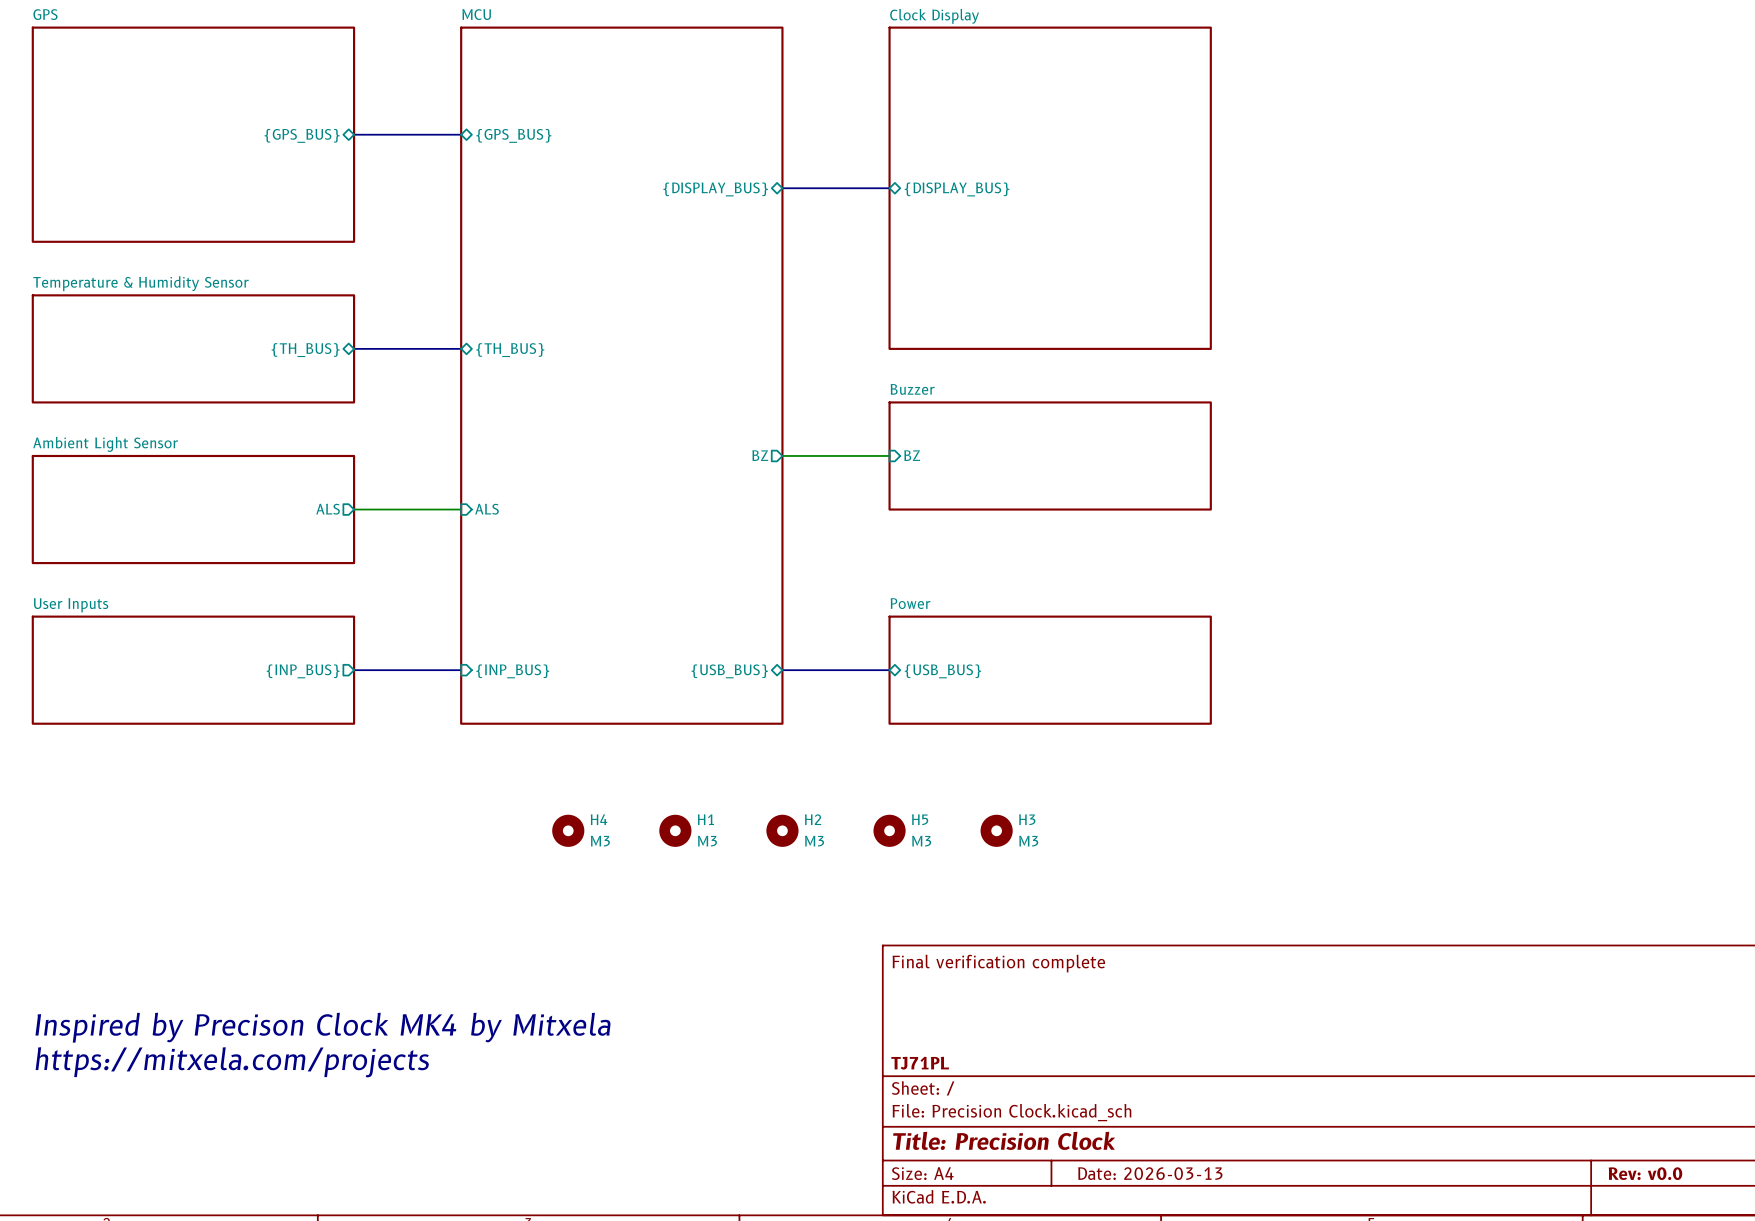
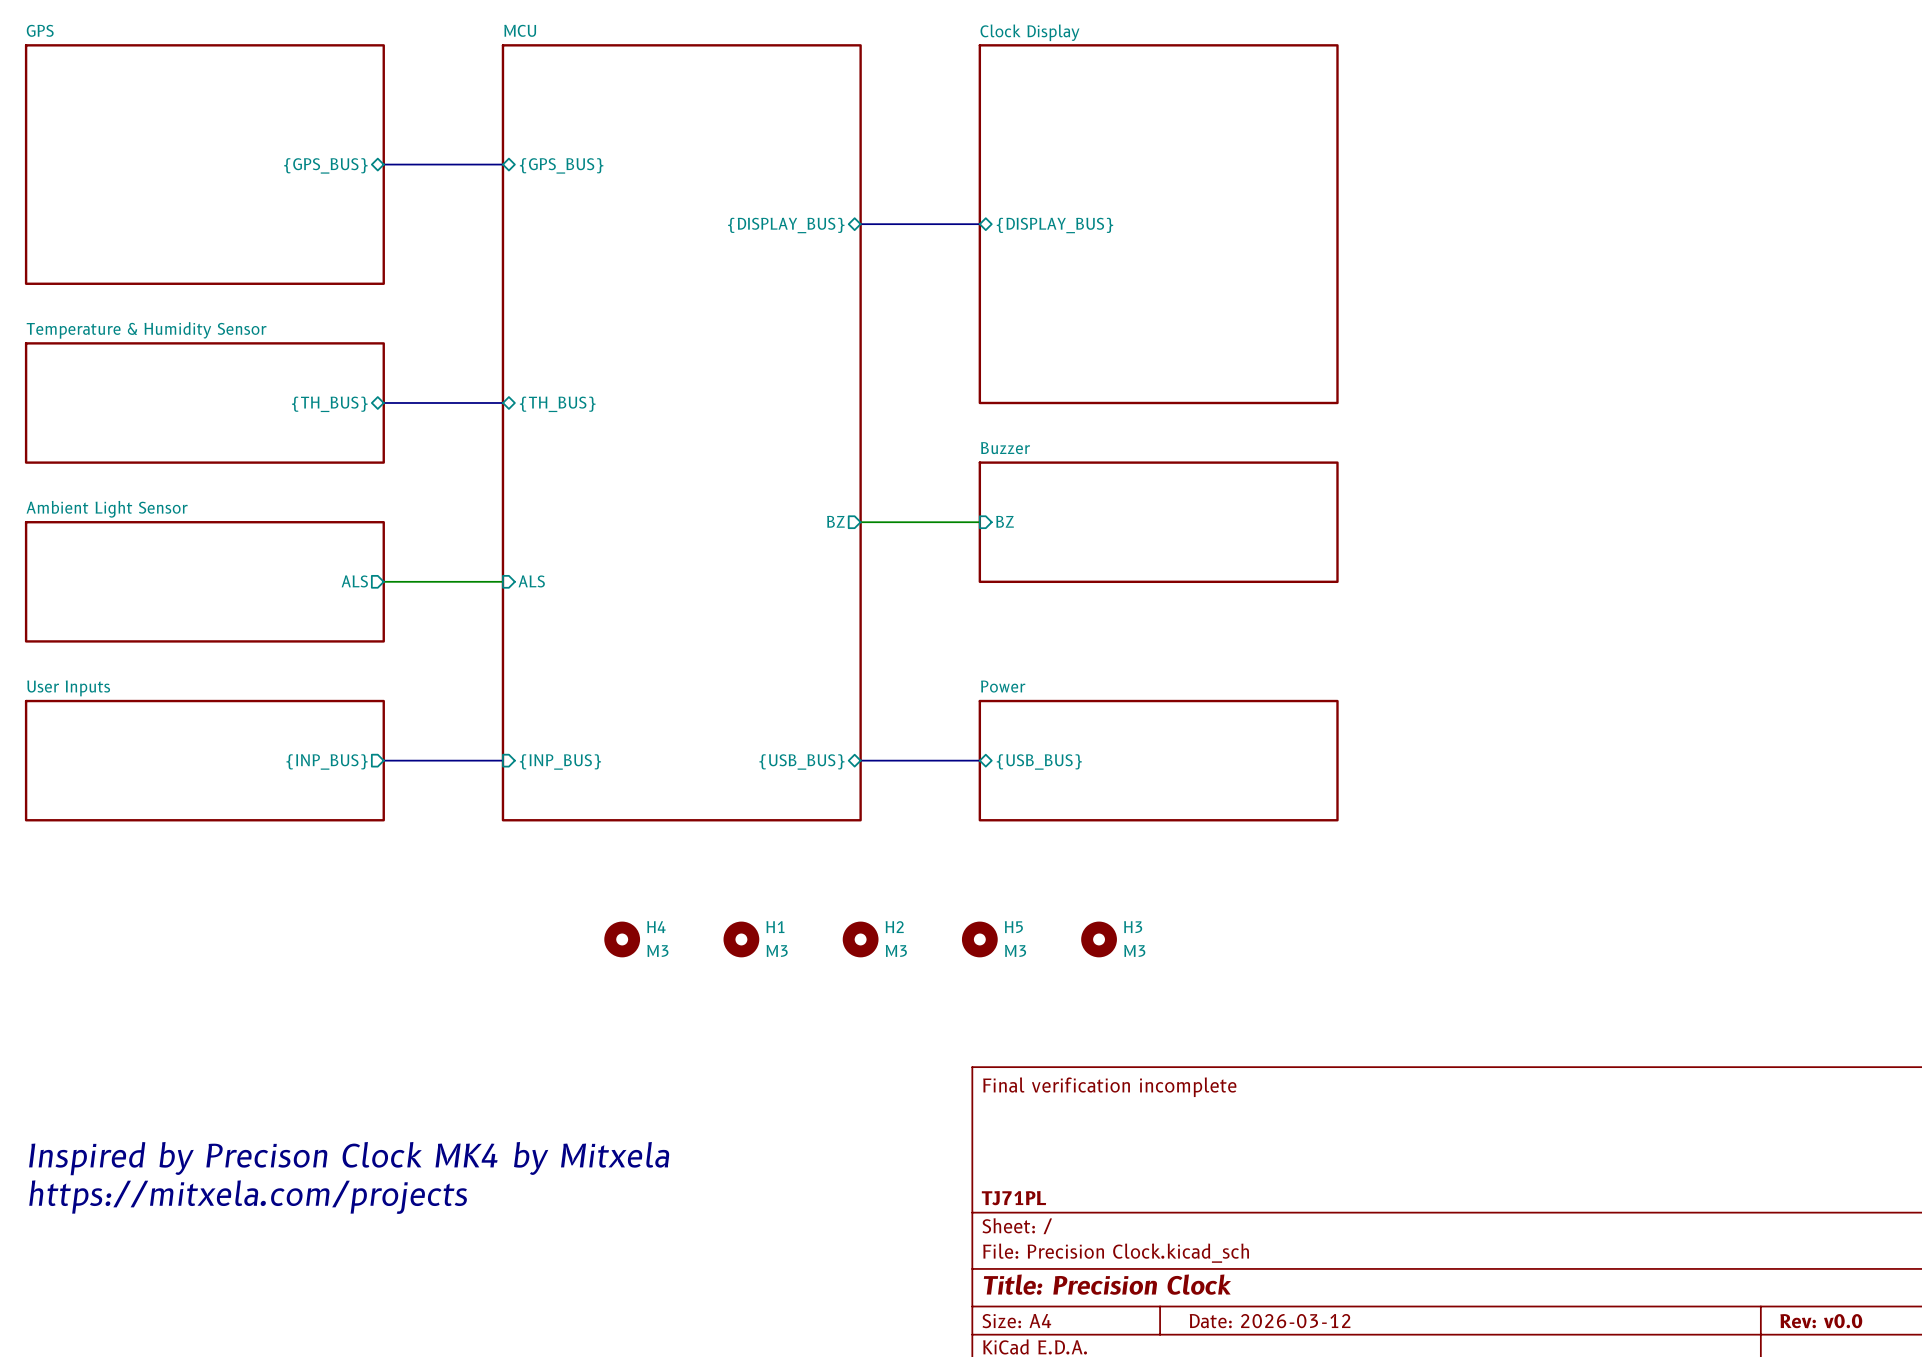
title block: Final verification complete (998, 963) -> Final verification incomplete (1109, 1087)
title block: Date: 2026-03-13 (1150, 1173) -> Date: 2026-03-12 (1270, 1321)

